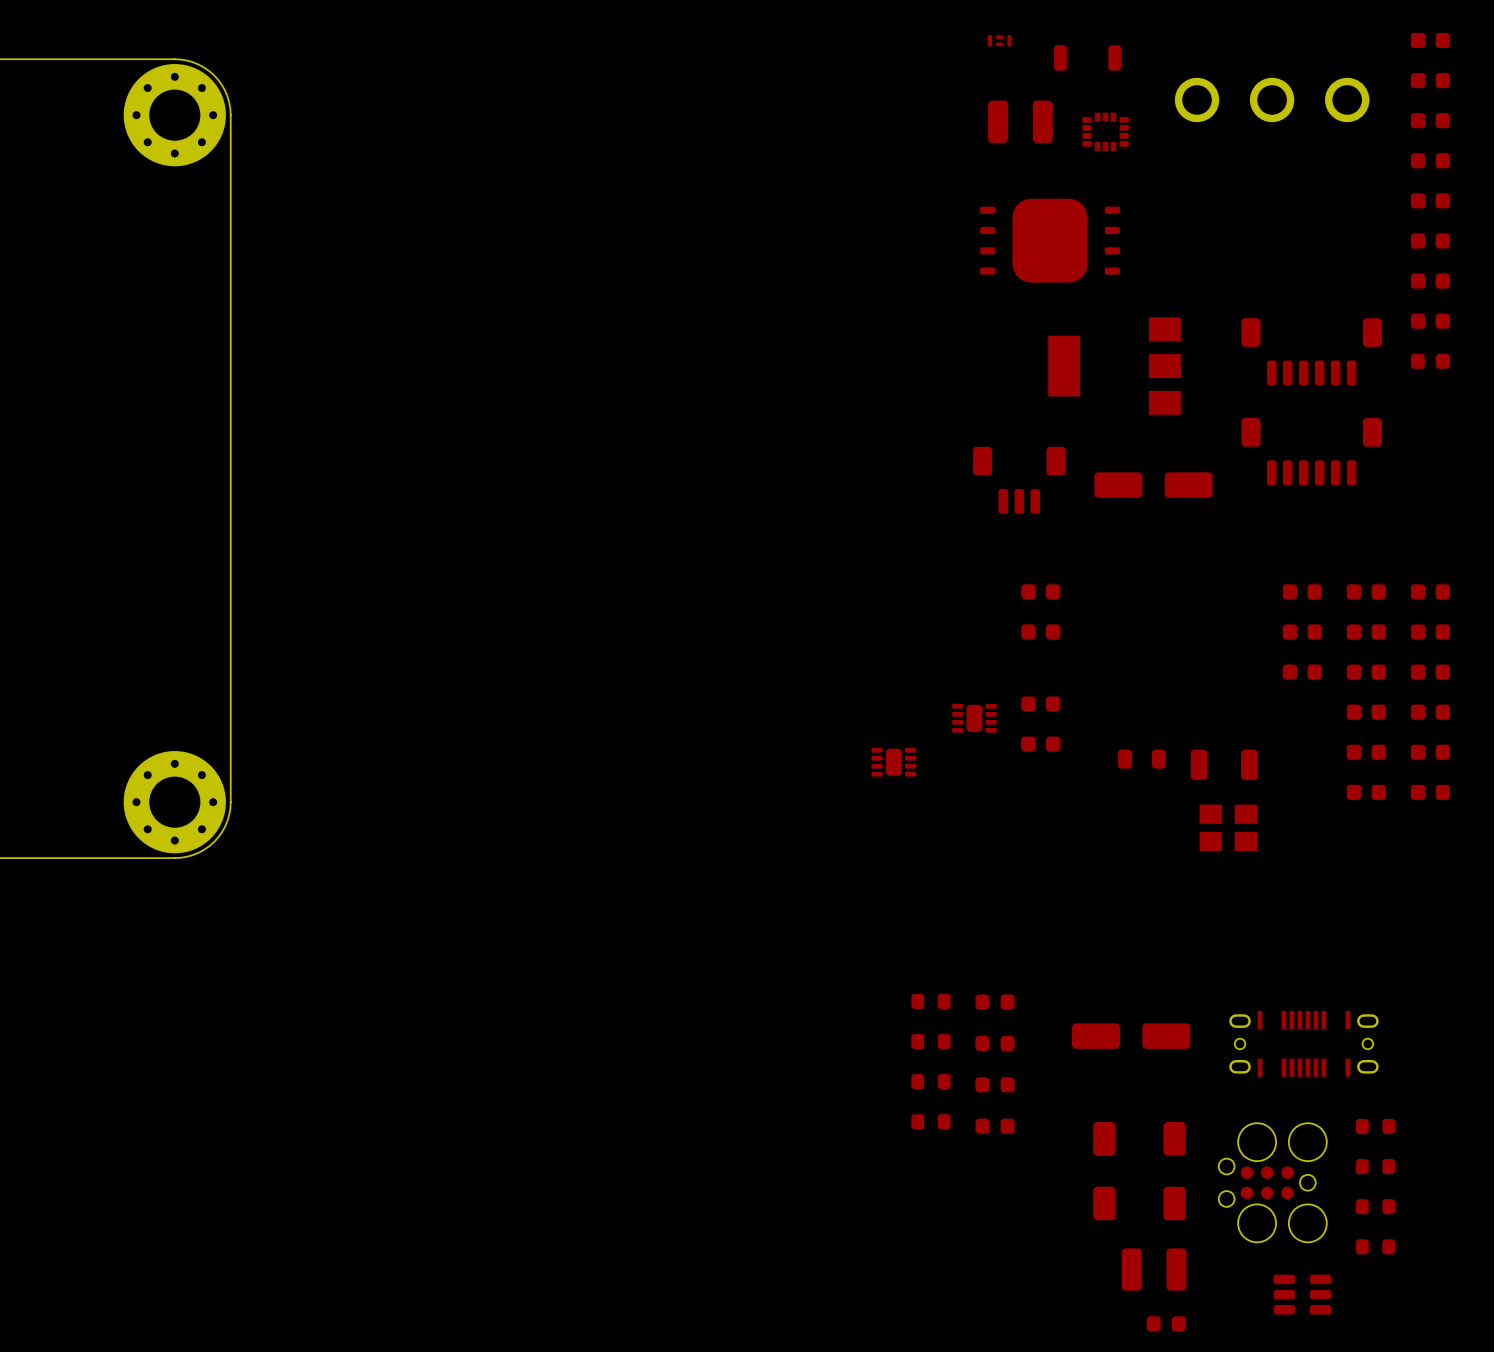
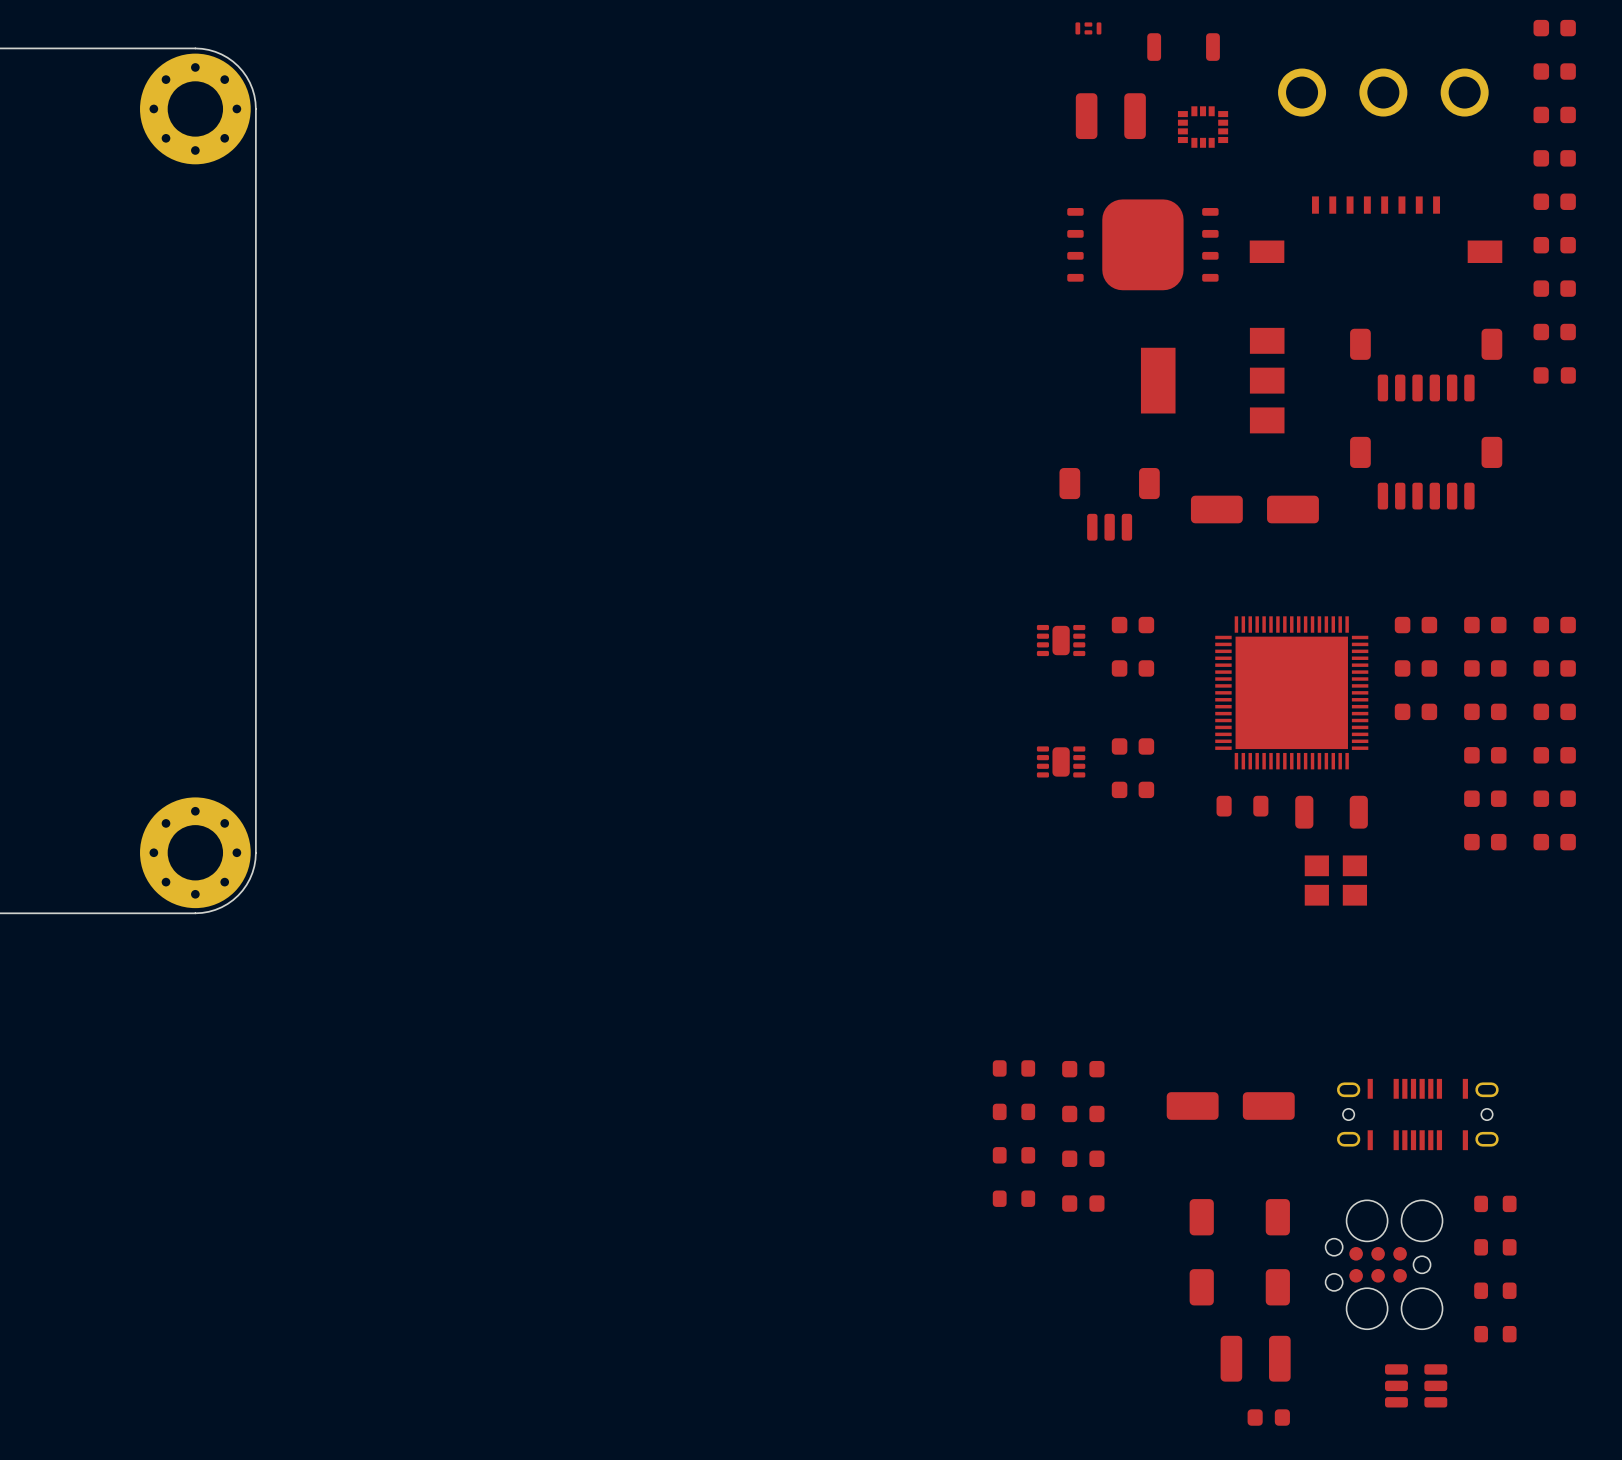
part: none -> (1376, 229)
part: none -> (1291, 692)
part position: (893, 762) -> (1061, 640)

